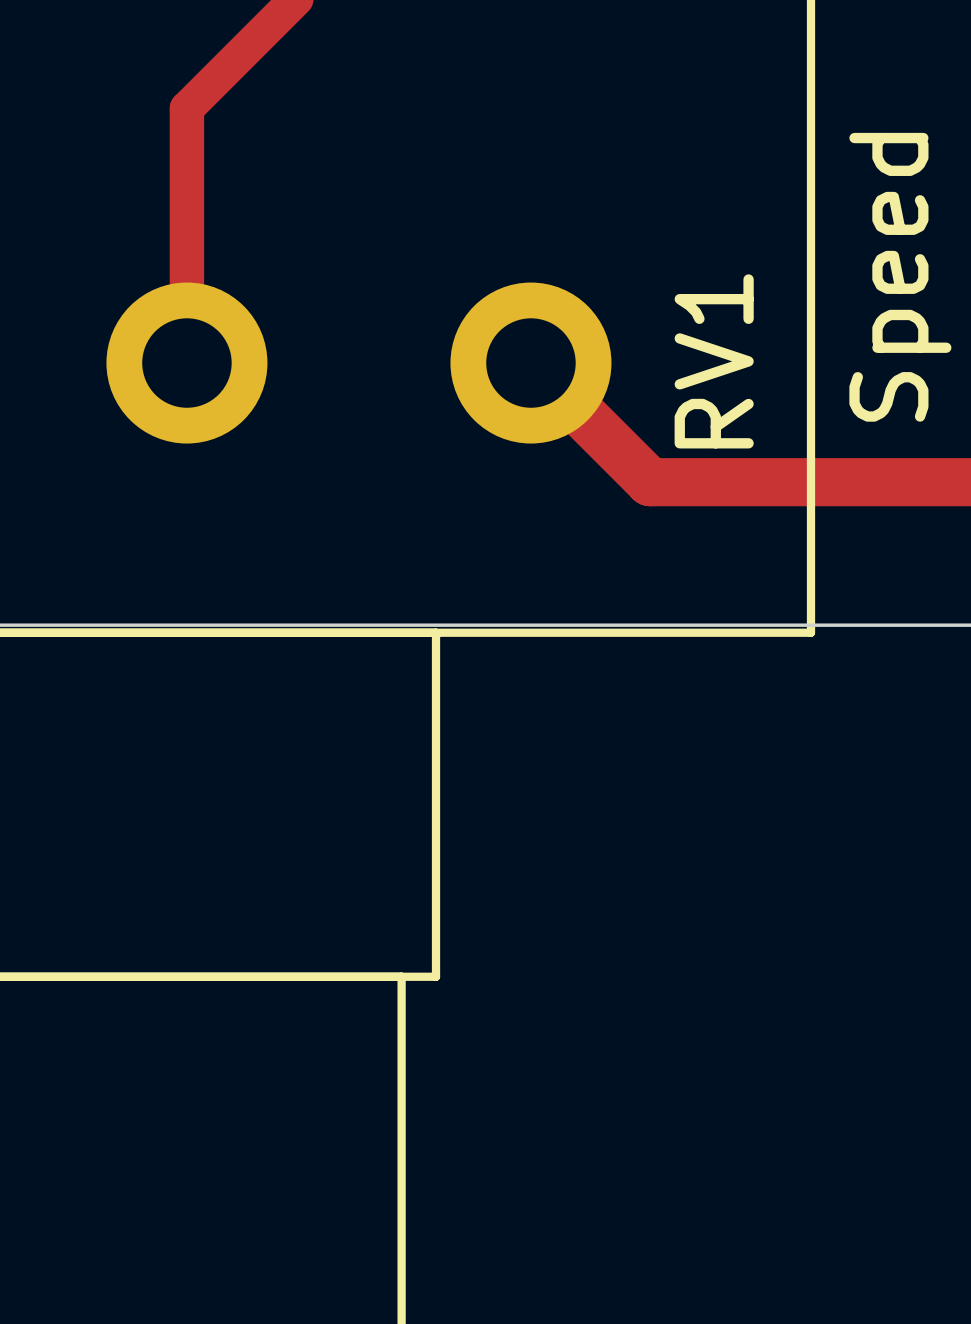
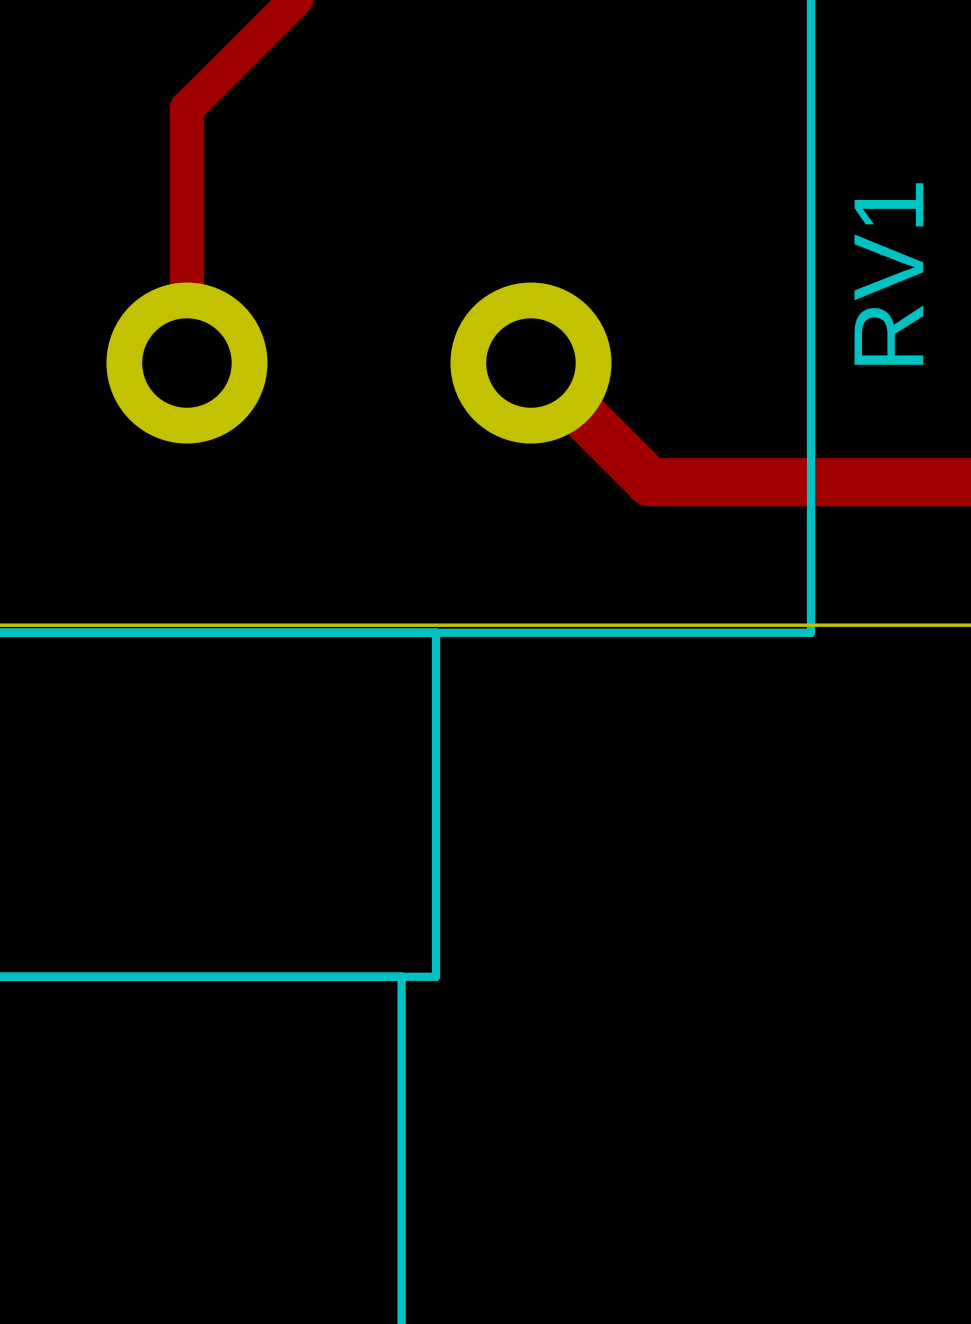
text: Speed (900, 277) -> none
RV1 name position: RV1 (714, 361) -> RV1 (888, 273)

